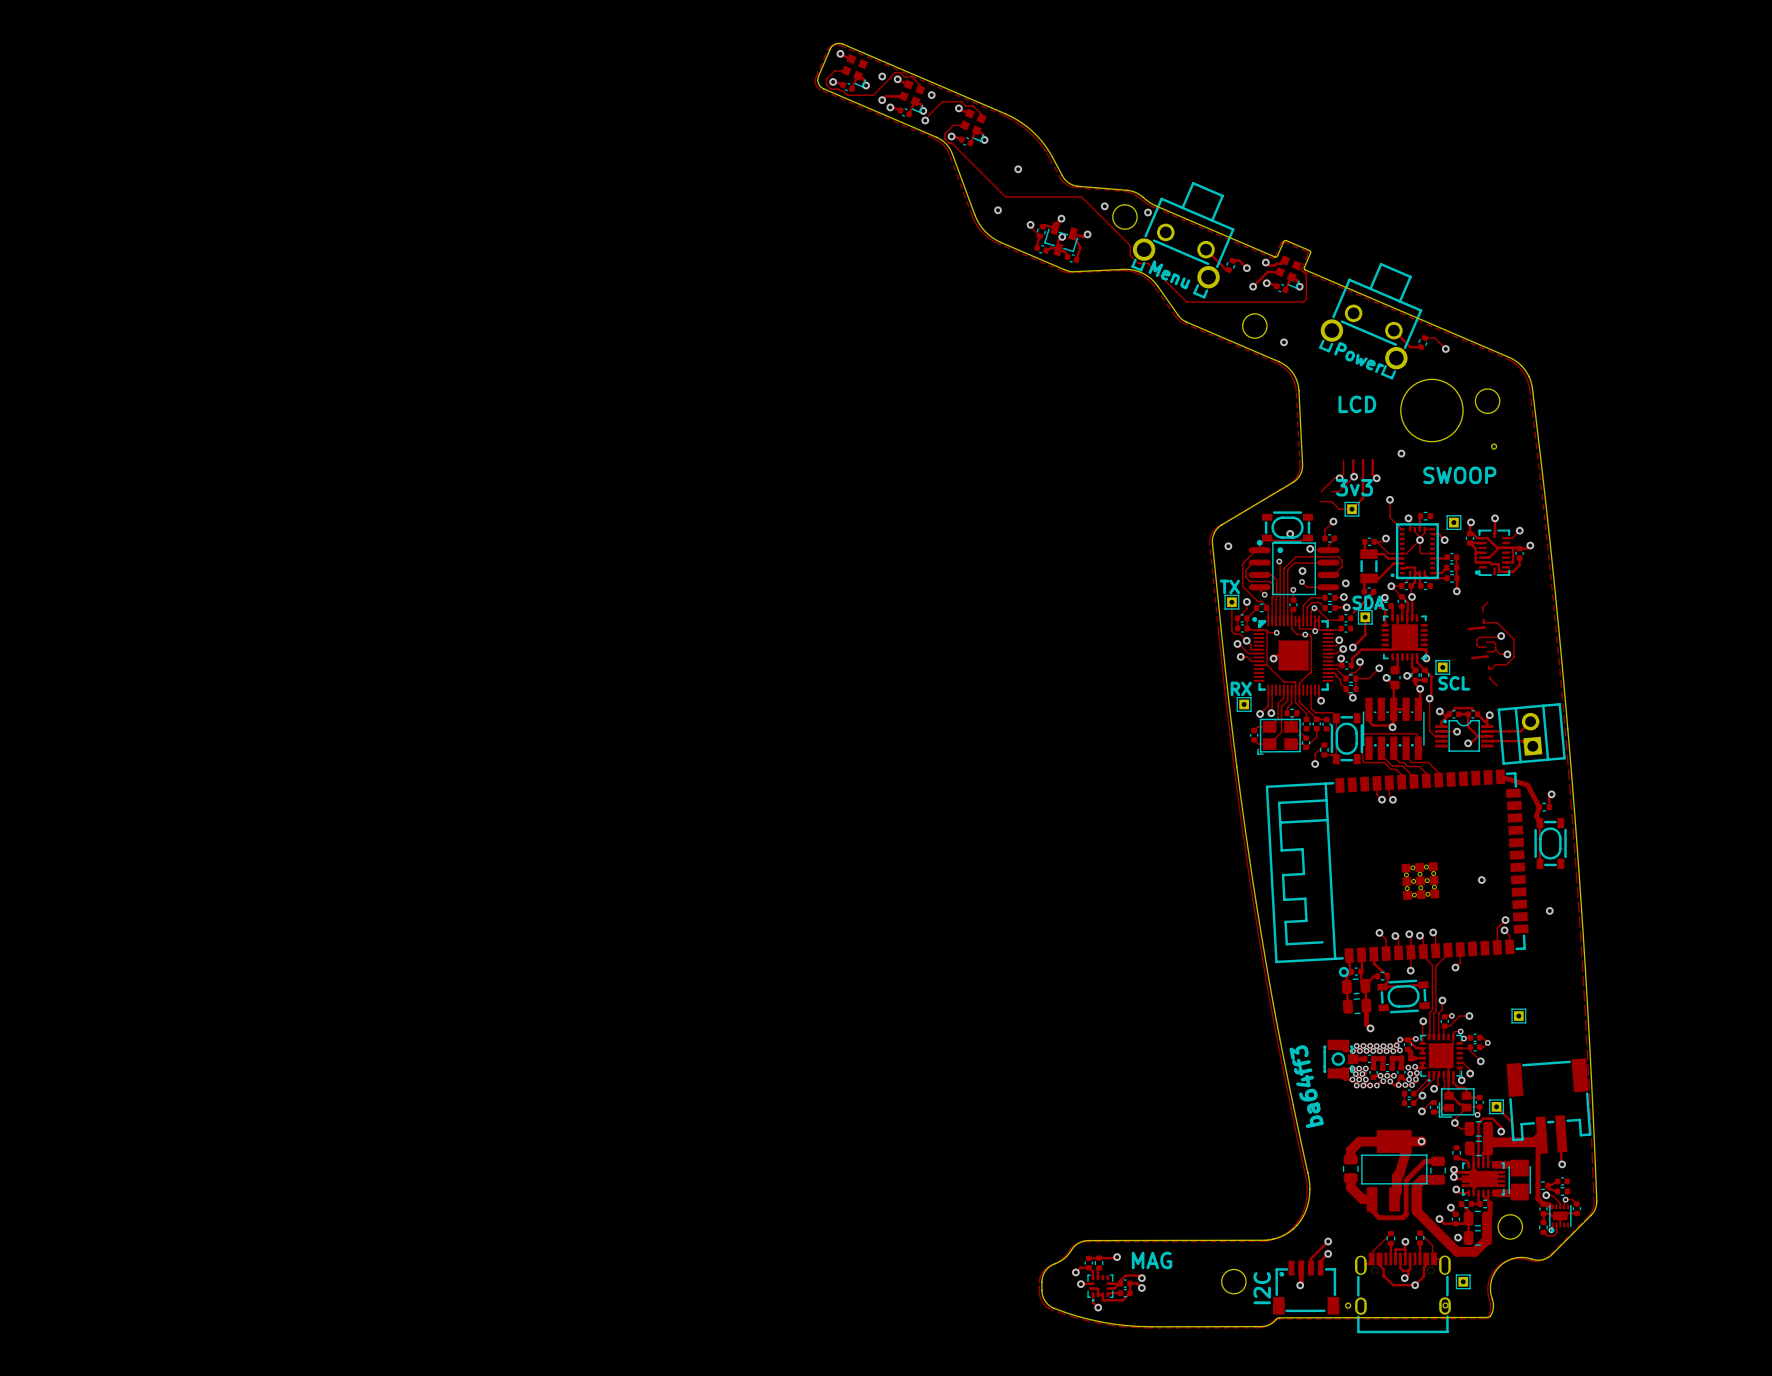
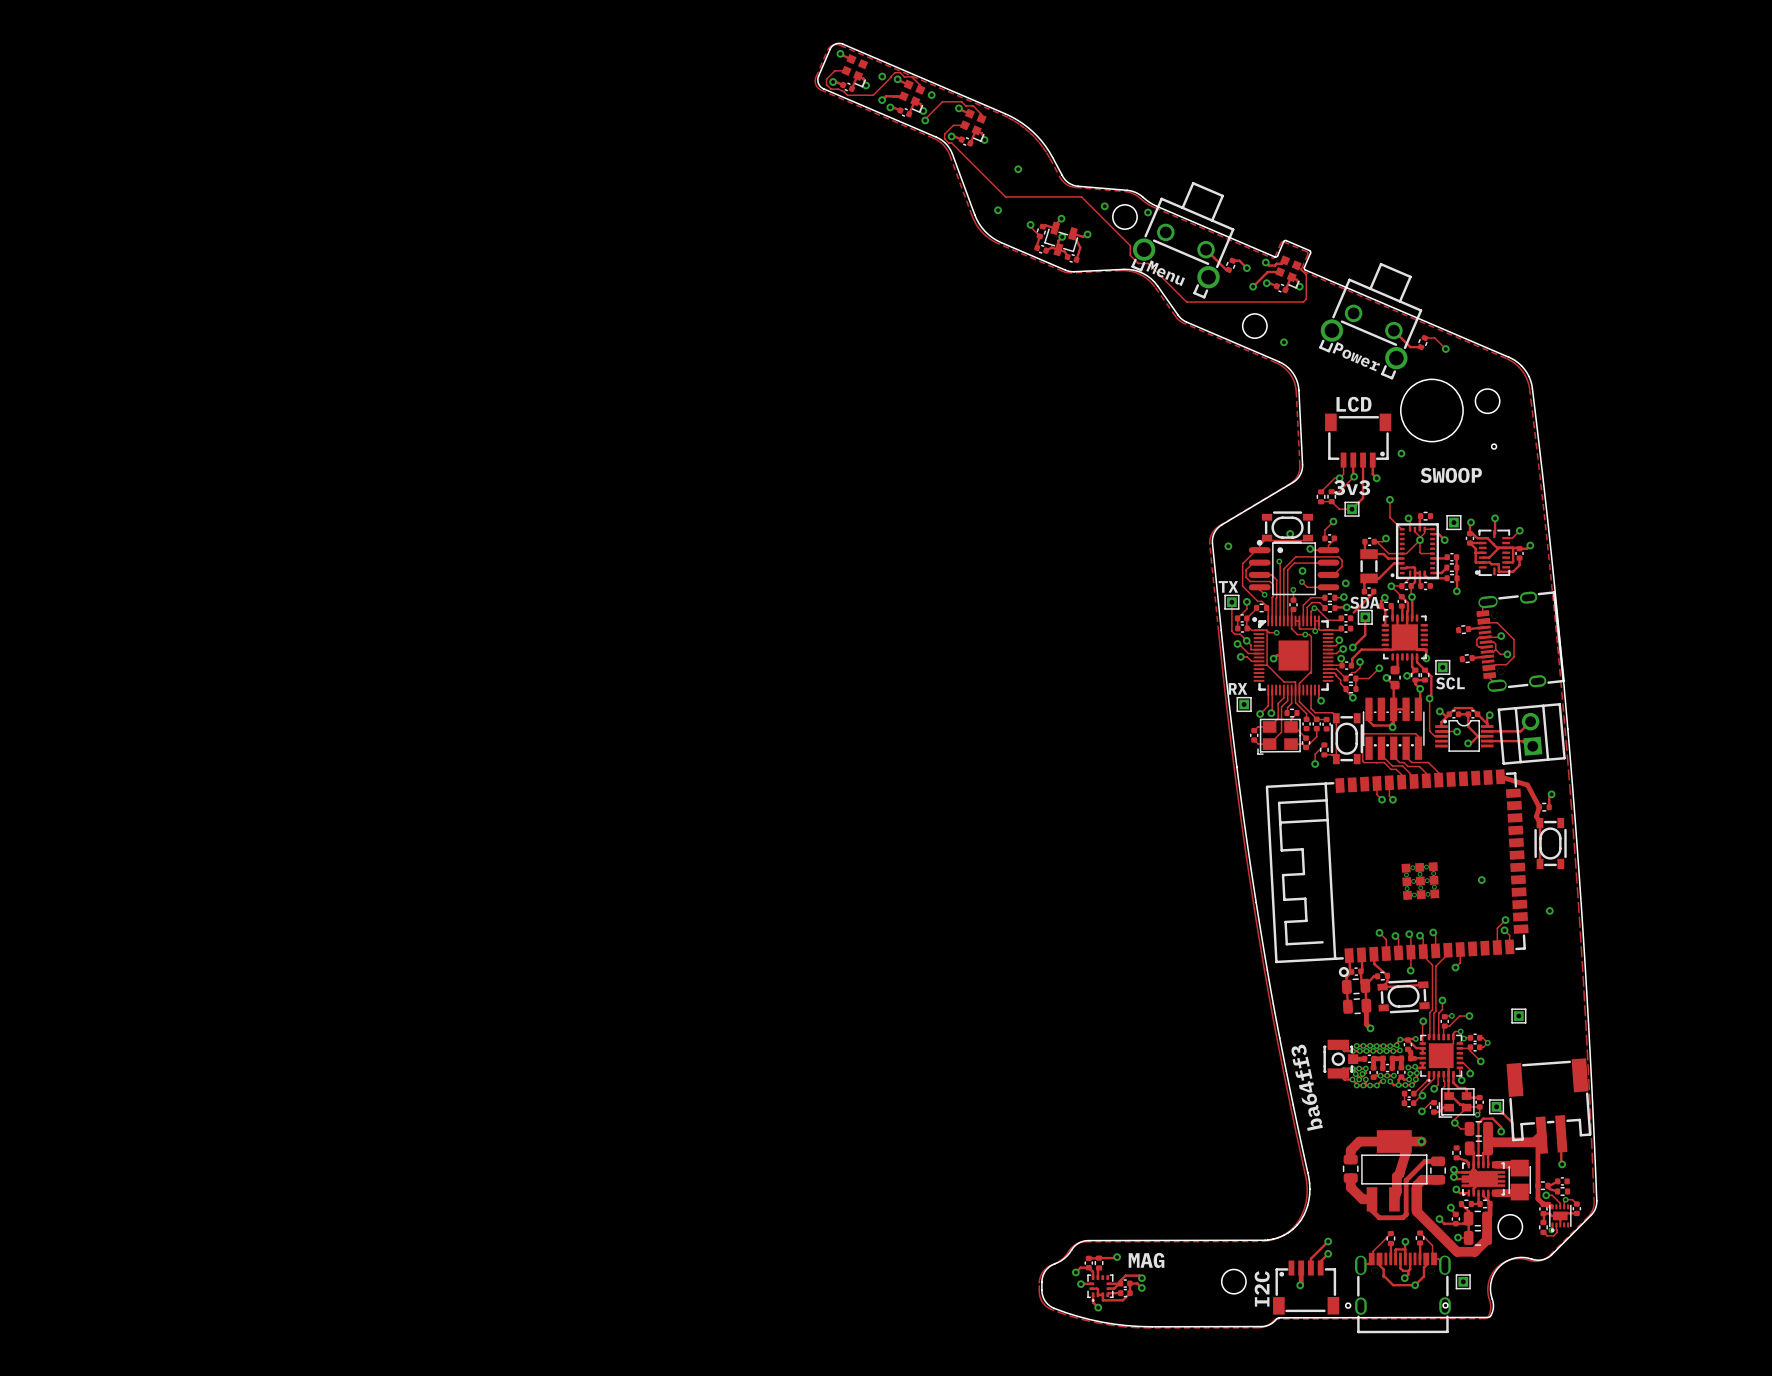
part: none -> (1358, 440)
part: none -> (1321, 496)
part: none -> (1331, 496)
part: none -> (1463, 629)
part: none -> (1520, 641)
part: none -> (1467, 658)

